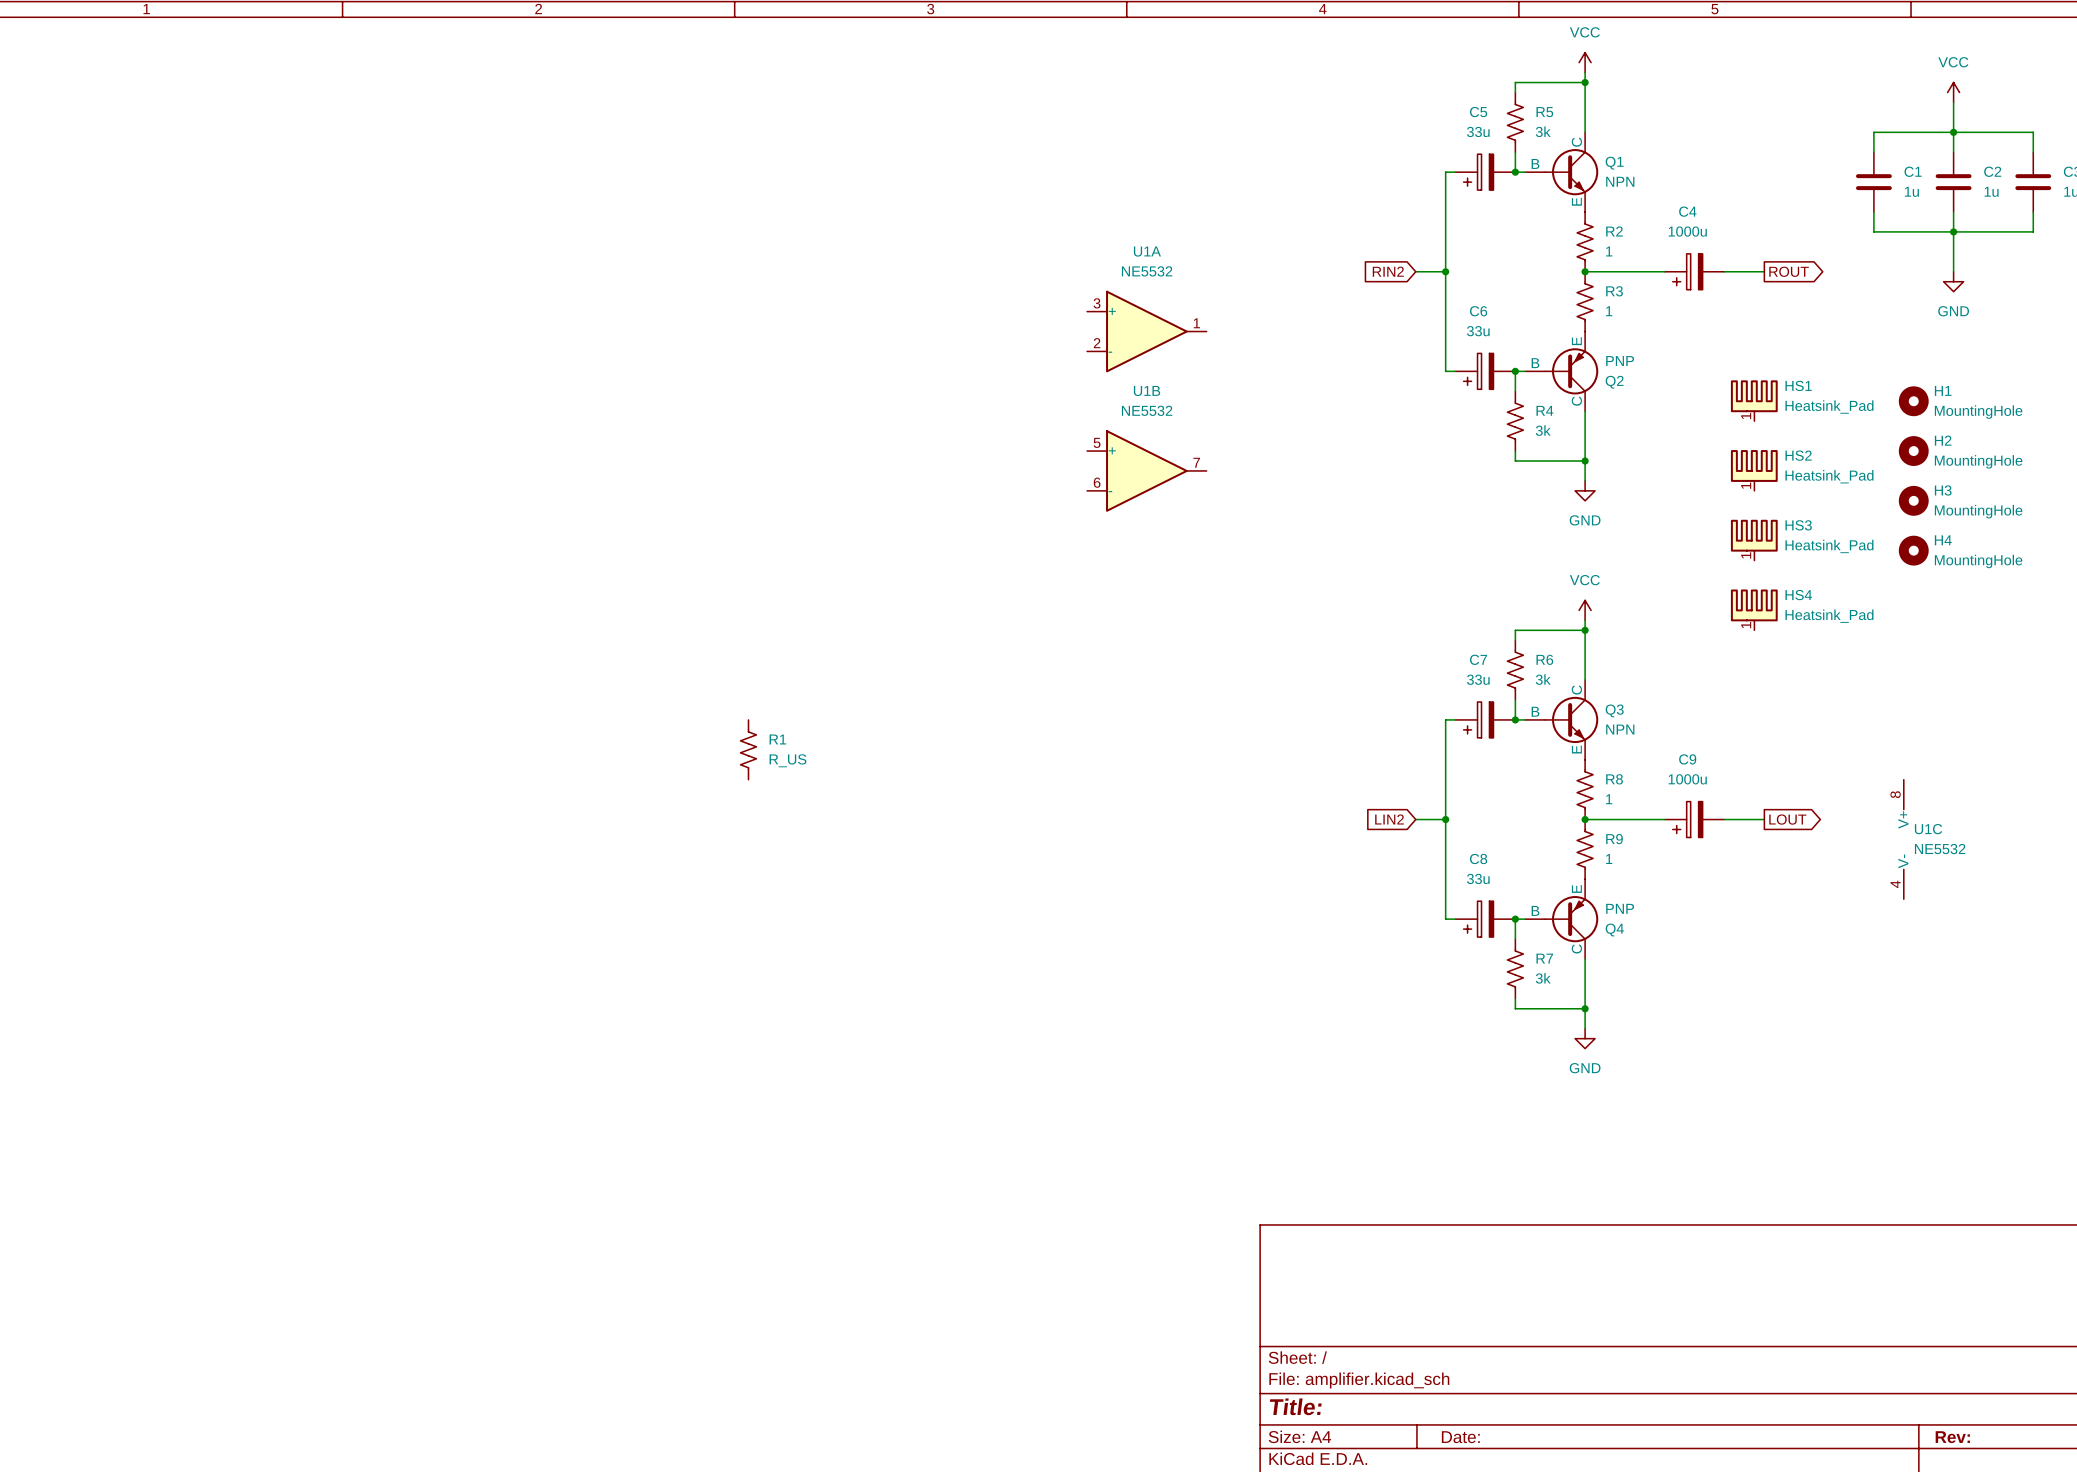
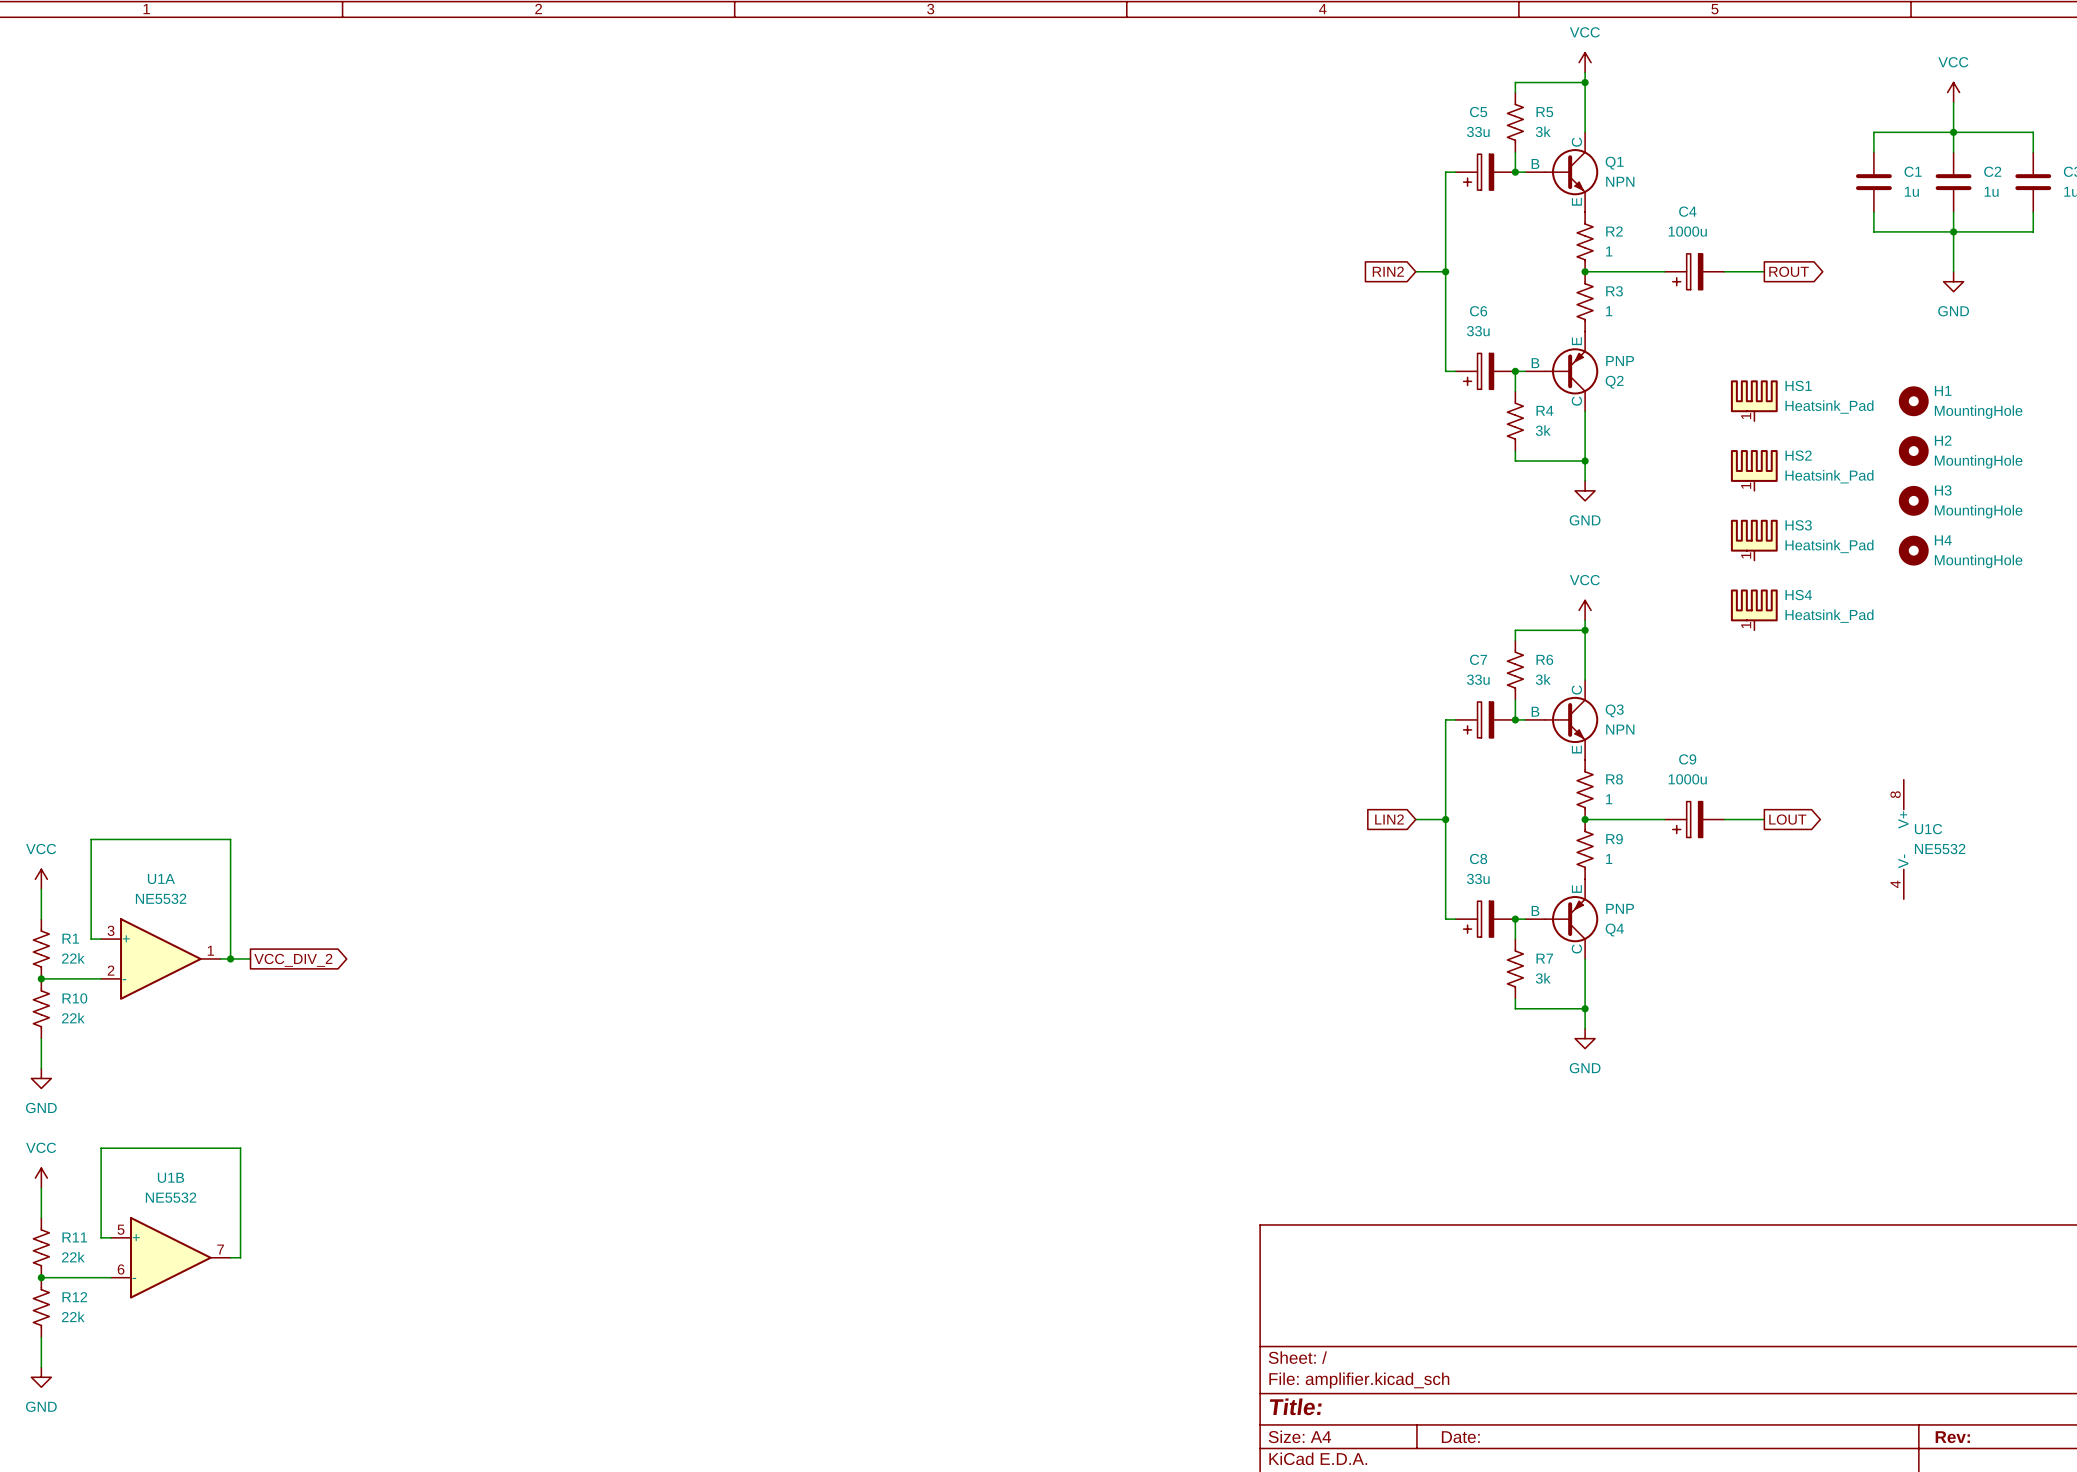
U1A position: (1146, 331) -> (160, 958)
U1B position: (1146, 470) -> (170, 1257)
R1 position: (748, 749) -> (41, 949)
R1 value: R_US (787, 760) -> 22k (73, 958)
power symbol: none -> VCC (41, 879)
wire: none -> (41, 889) (41, 919)
wire: none -> (101, 939) (91, 939) (91, 839) (230, 839) (230, 958)
wire: none -> (220, 958) (250, 958)
junction: none -> (230, 958)
global label: none -> VCC_DIV_2 (293, 960)
wire: none -> (41, 978) (101, 978)
junction: none -> (41, 978)
R10: none -> 22k (41, 1008)
wire: none -> (41, 1038) (41, 1068)
power symbol: none -> GND (41, 1078)
power symbol: none -> VCC (41, 1178)
wire: none -> (41, 1188) (41, 1217)
wire: none -> (111, 1237) (101, 1237) (101, 1148) (240, 1148) (240, 1257) (230, 1257)
R11: none -> 22k (41, 1247)
wire: none -> (41, 1277) (111, 1277)
junction: none -> (41, 1277)
R12: none -> 22k (41, 1307)
wire: none -> (41, 1337) (41, 1367)
power symbol: none -> GND (41, 1377)

